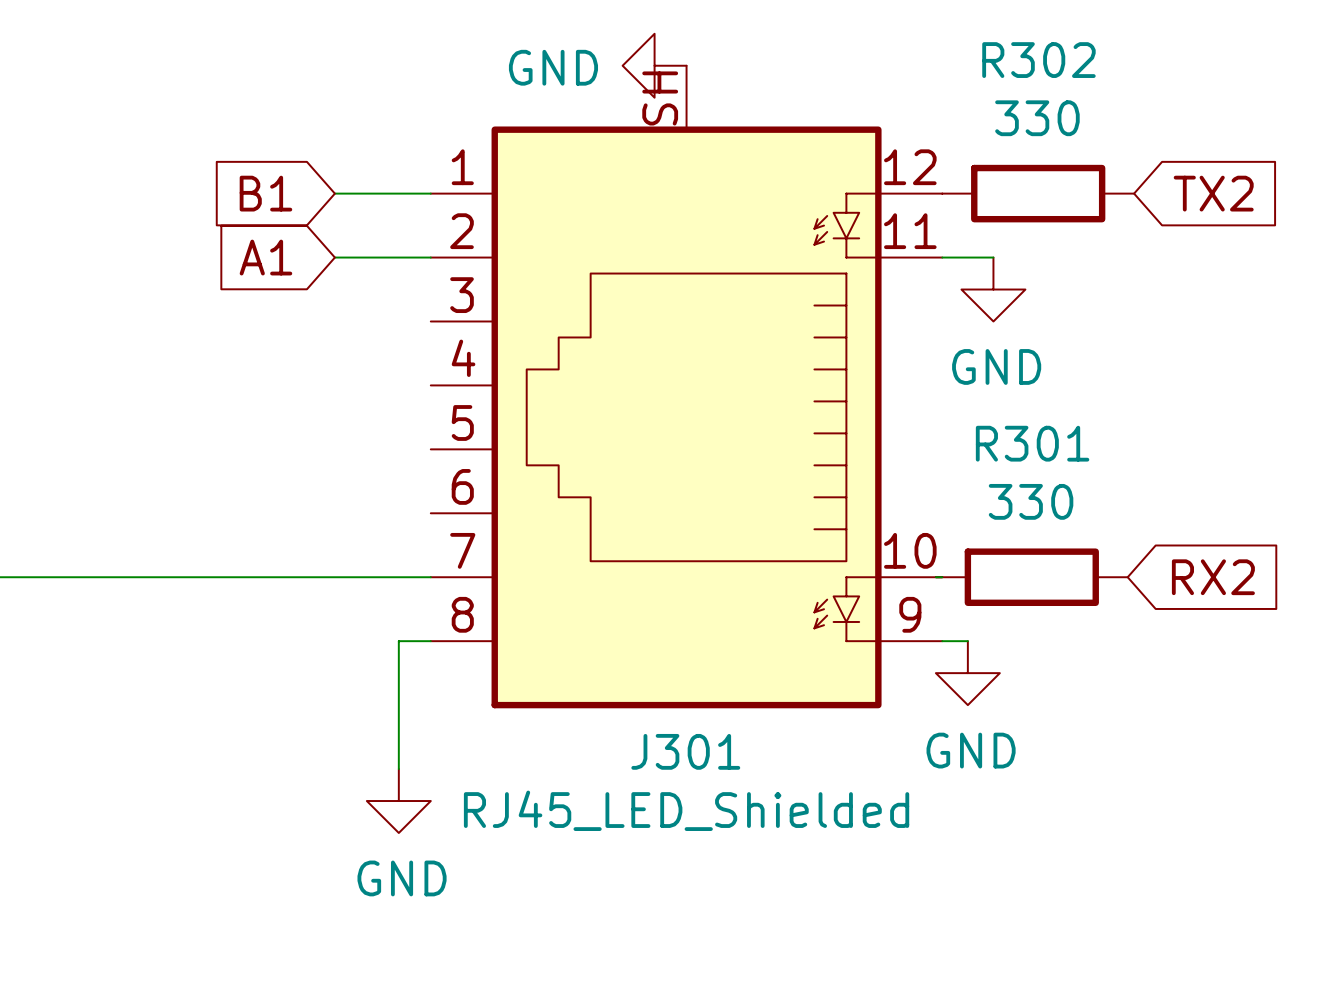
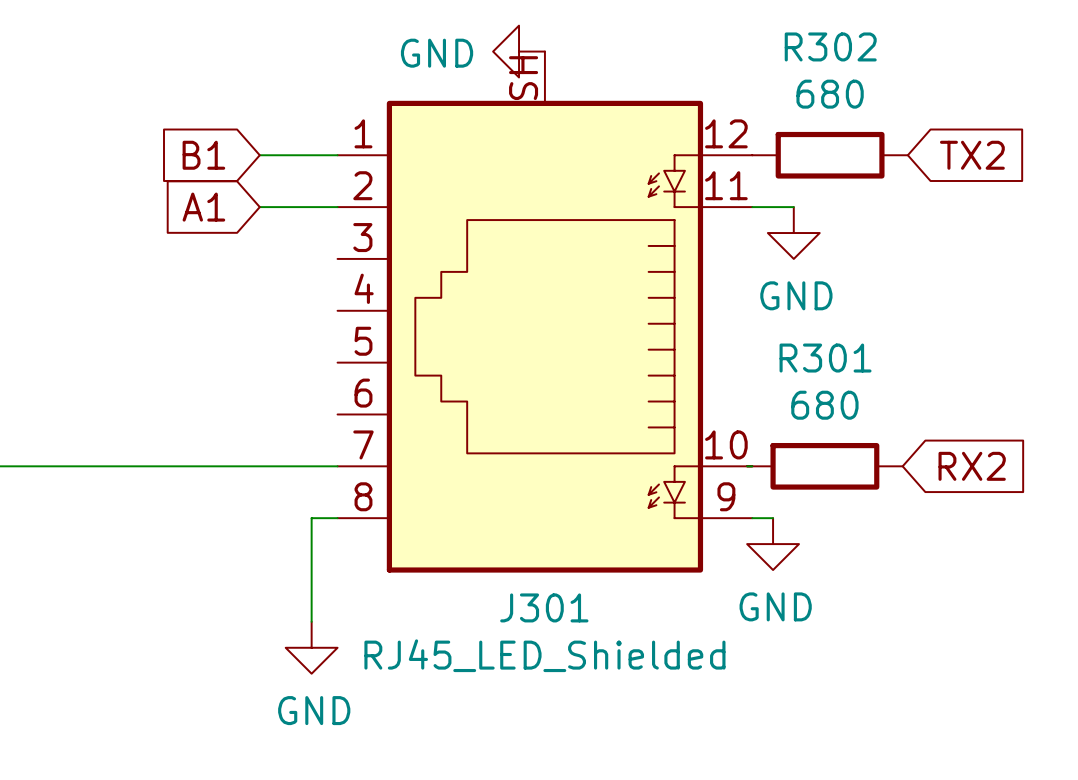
R302 value: 330 (1037, 118) -> 680 (830, 94)
R301 value: 330 (1031, 501) -> 680 (824, 405)

